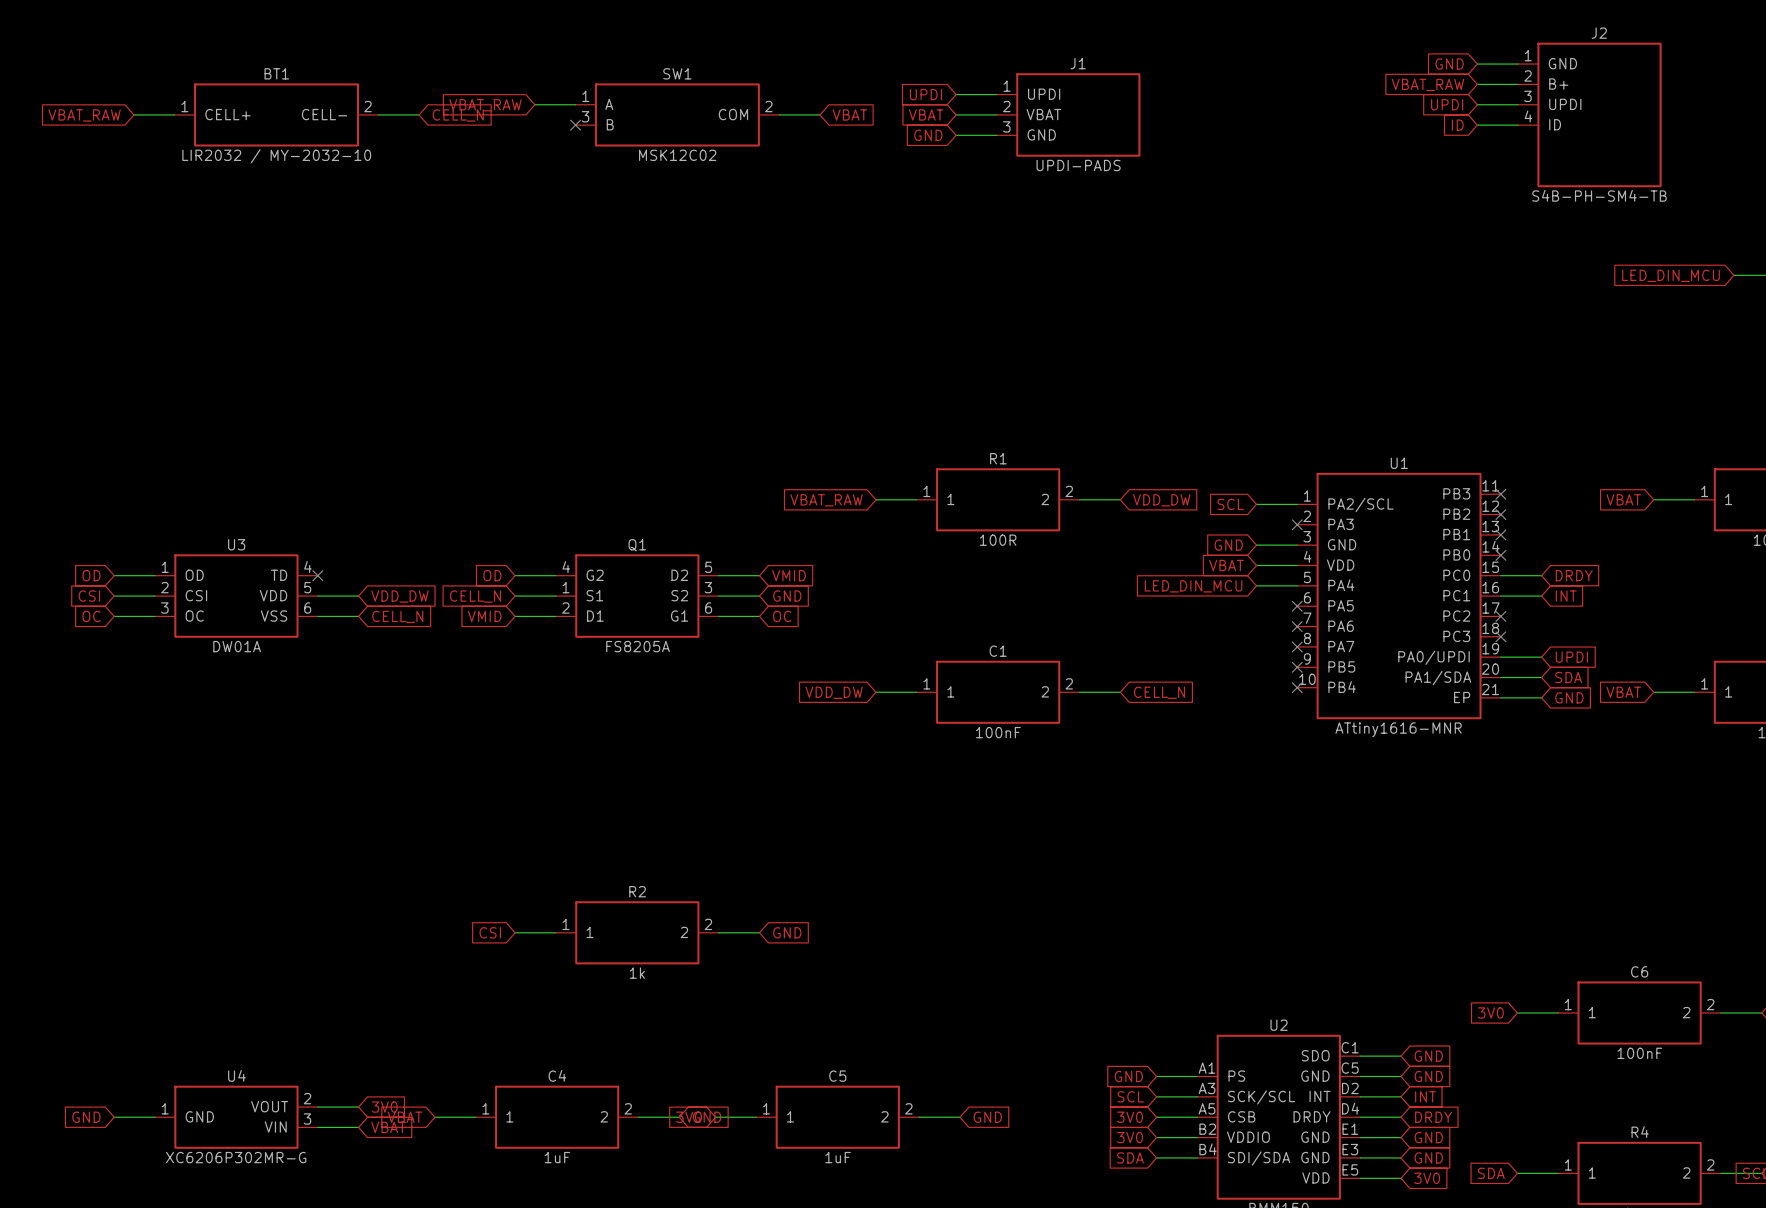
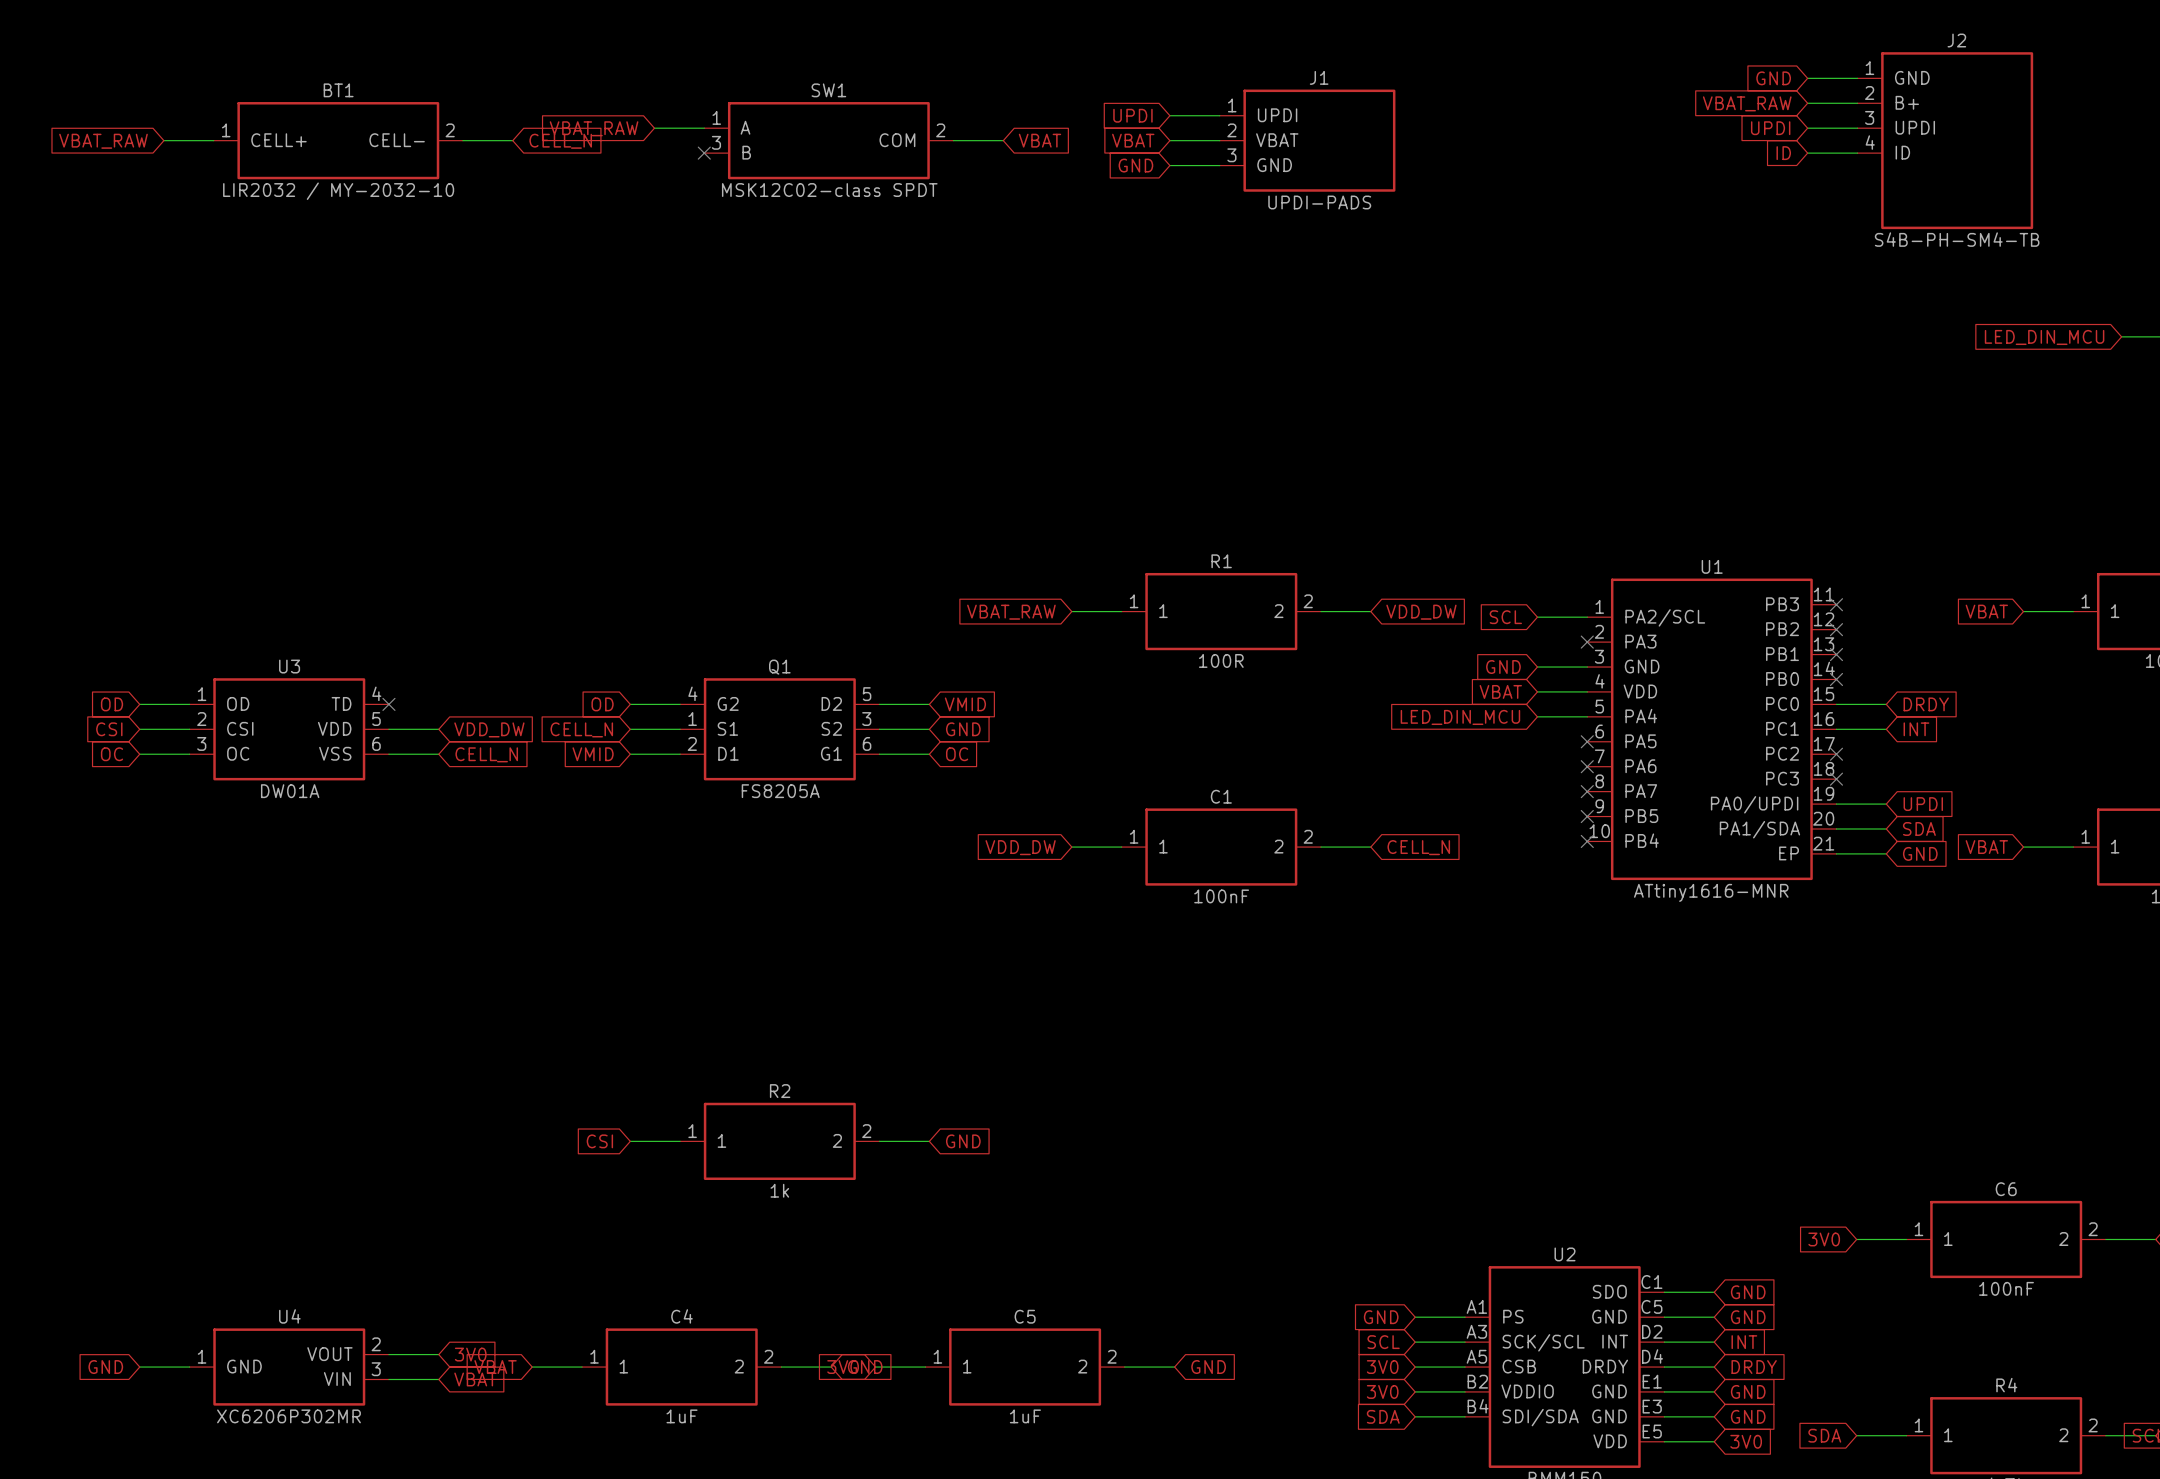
SW1 value: MSK12C02 (677, 155) -> MSK12C02-class SPDT (829, 190)
U4 value: XC6206P302MR-G (236, 1157) -> XC6206P302MR (288, 1416)

